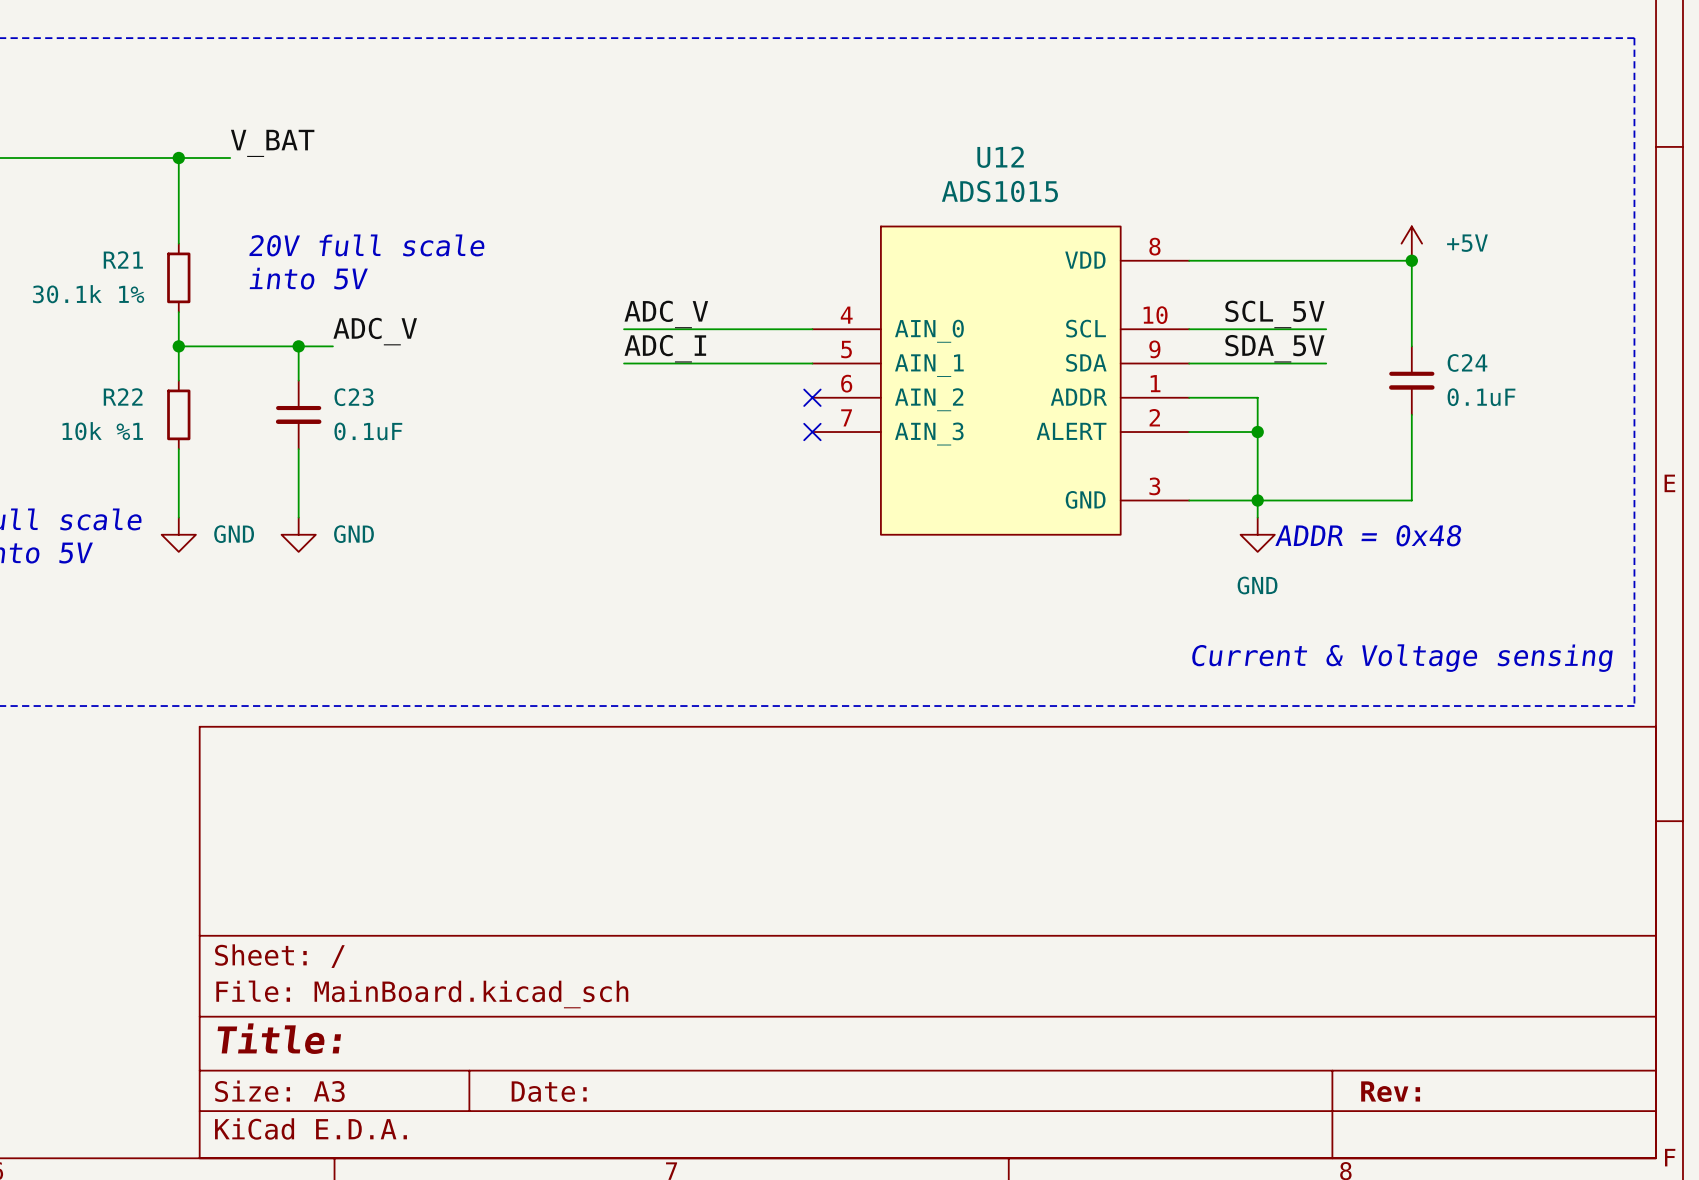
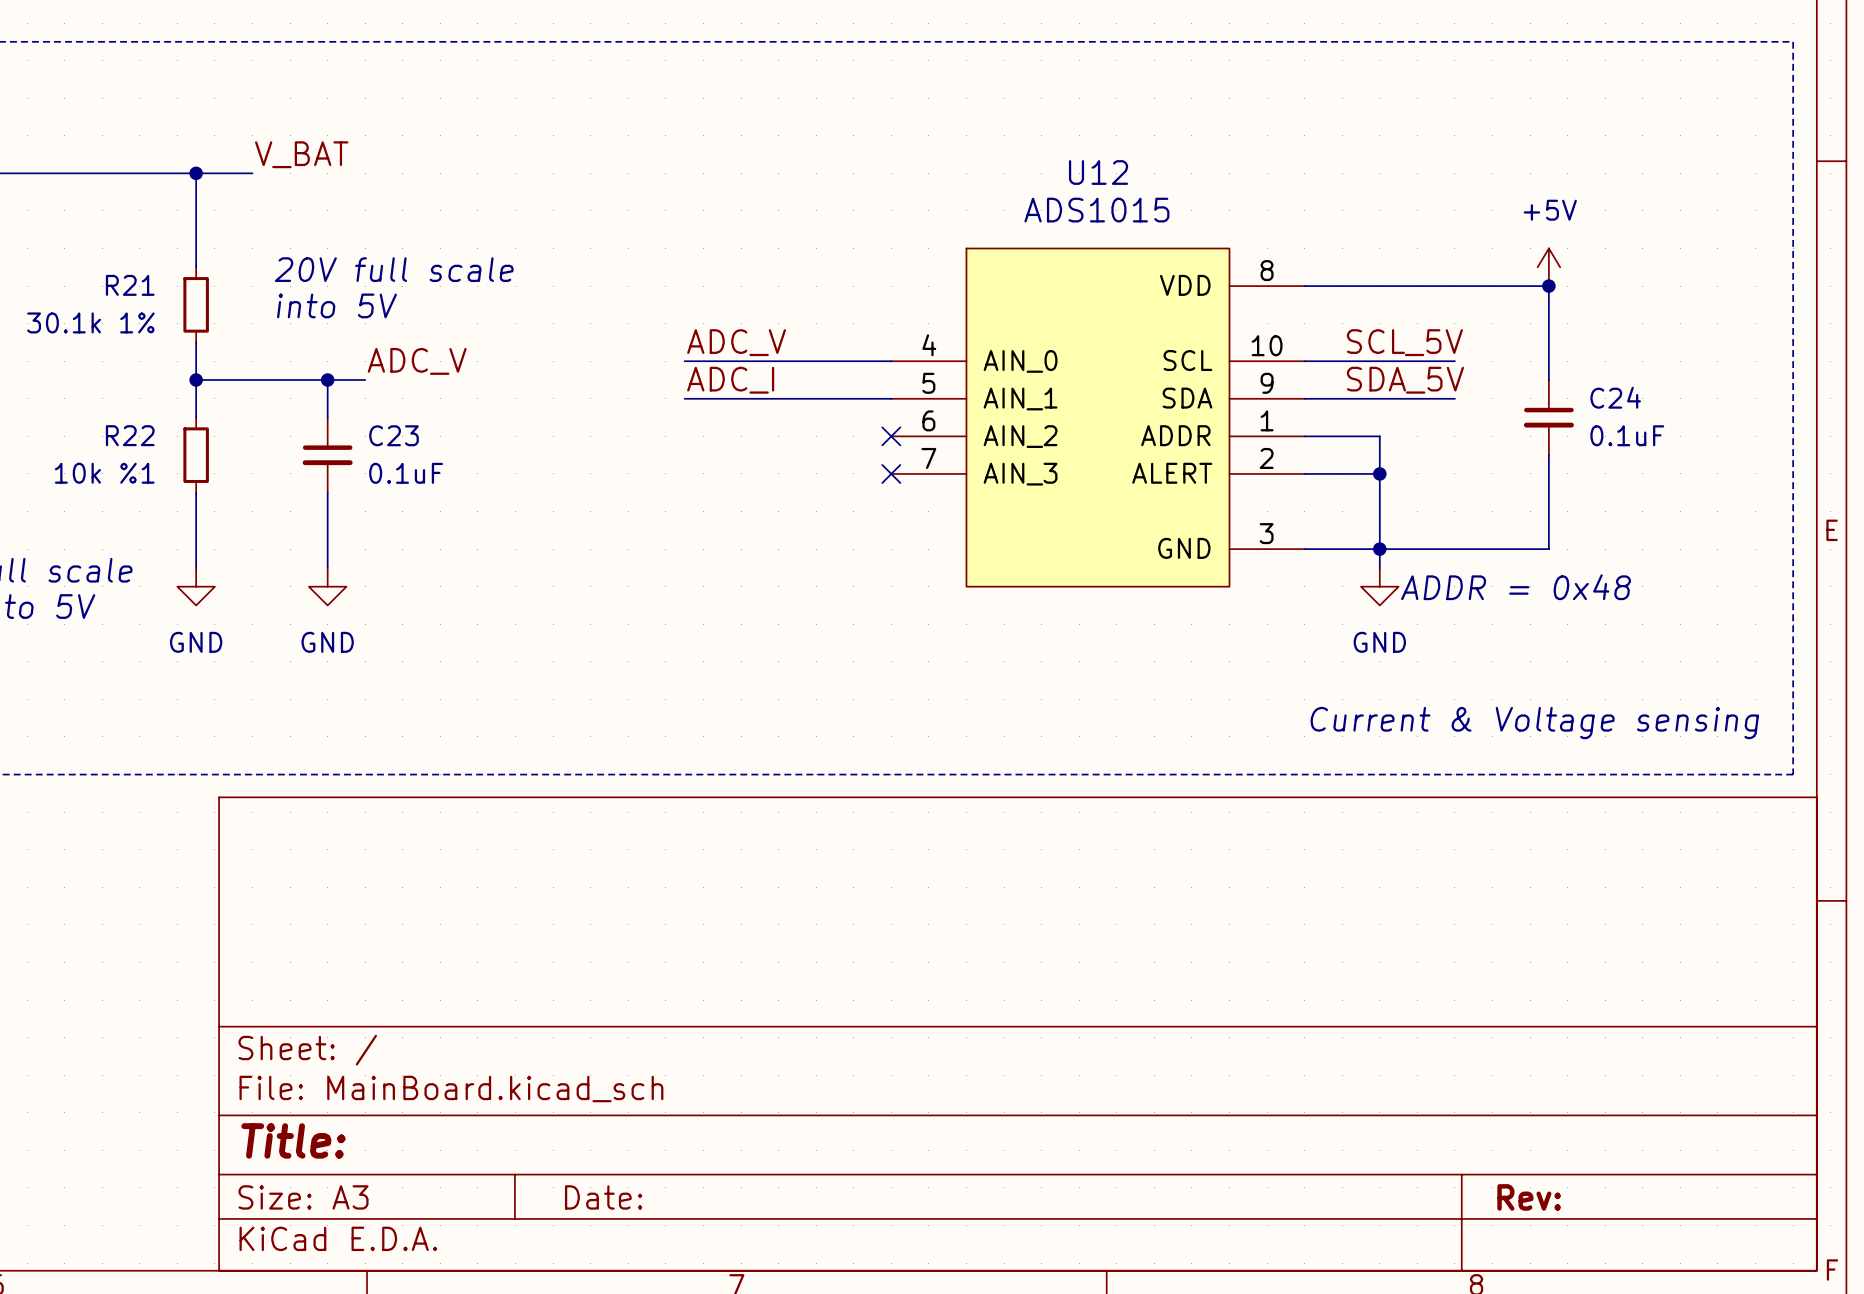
power symbol text position: +5V (1467, 243) -> +5V (1550, 210)
power symbol text position: GND (234, 534) -> GND (196, 642)
power symbol text position: GND (353, 534) -> GND (327, 642)

